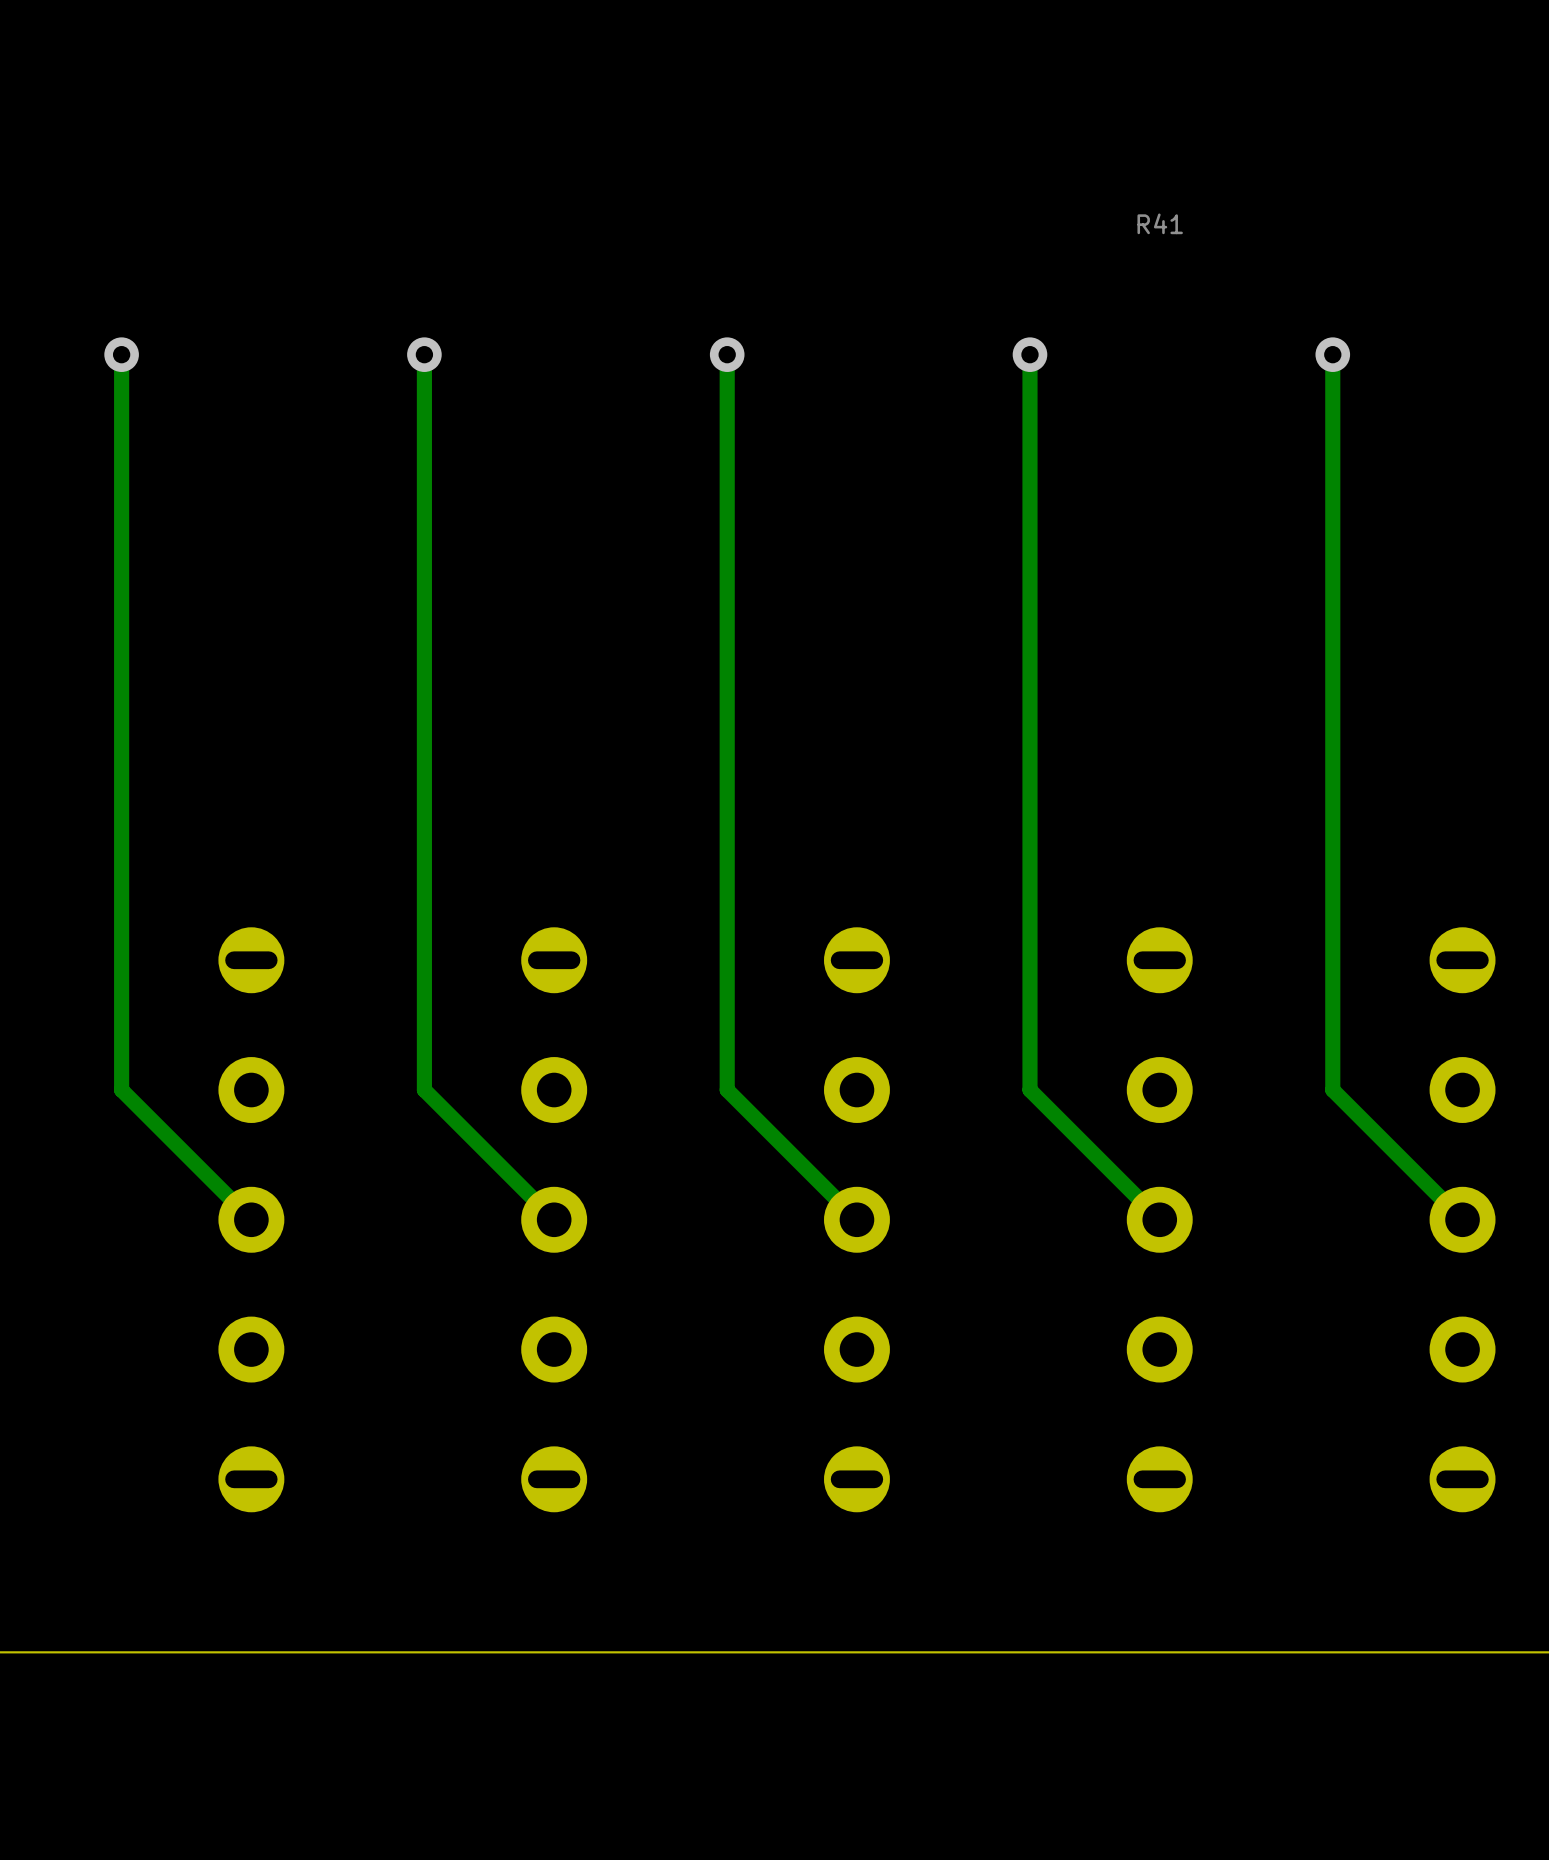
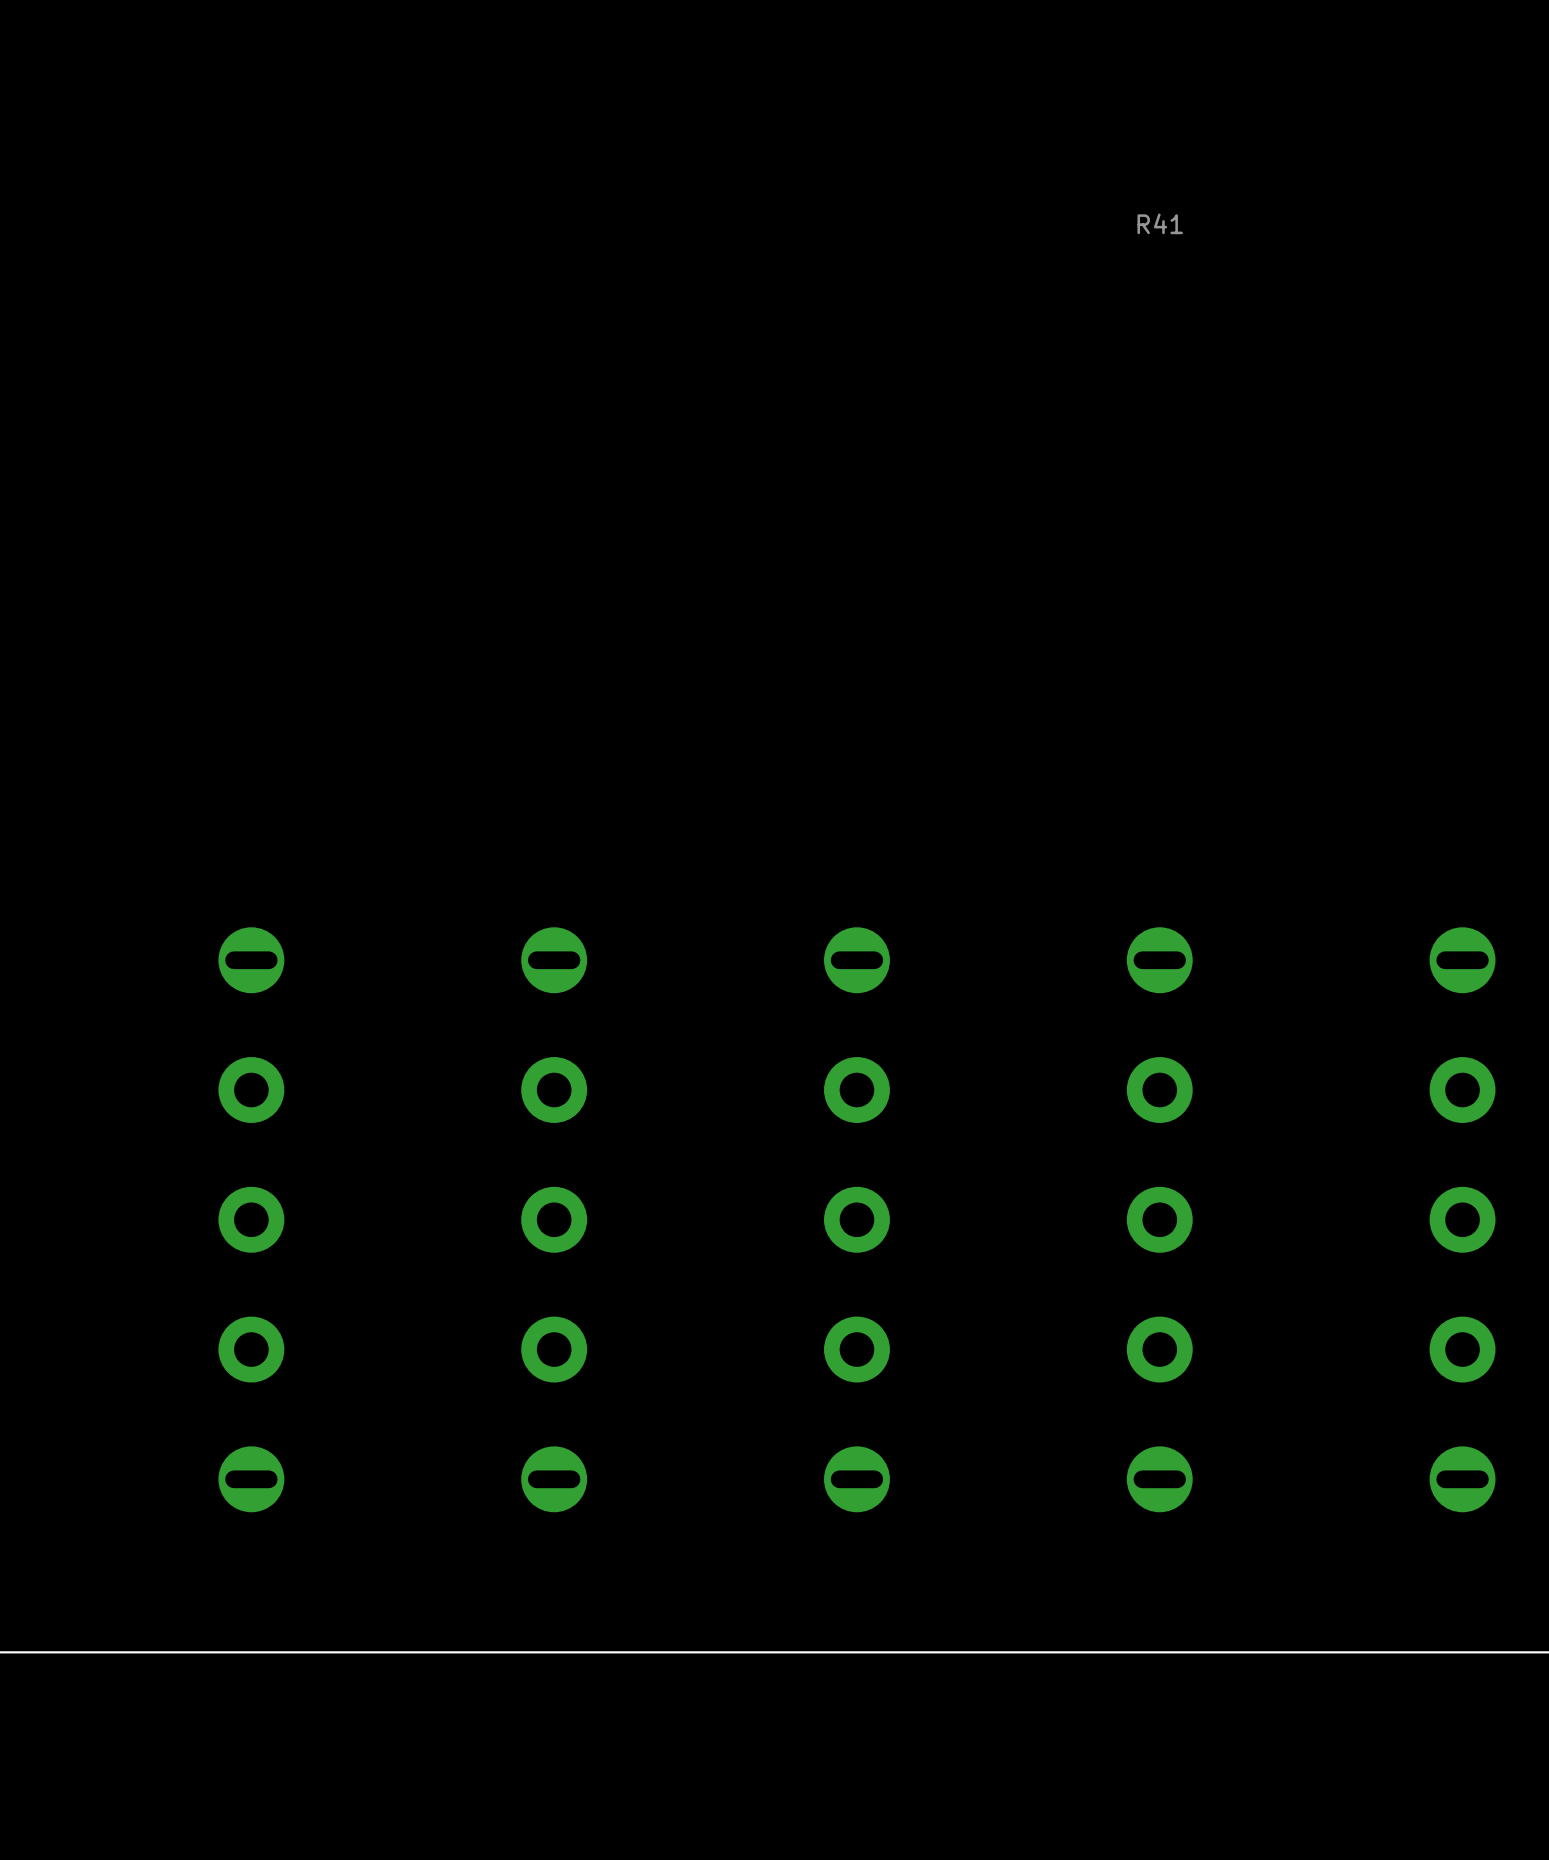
track: (121, 354) (121, 1090) (251, 1219) -> none
via: (121, 354) -> none
track: (424, 354) (424, 1090) (554, 1219) -> none
via: (424, 354) -> none
track: (727, 354) (727, 1090) (856, 1219) -> none
via: (727, 354) -> none
track: (1029, 354) (1029, 1090) (1159, 1219) -> none
via: (1029, 354) -> none
track: (1332, 354) (1332, 1090) (1462, 1219) -> none
via: (1332, 354) -> none

